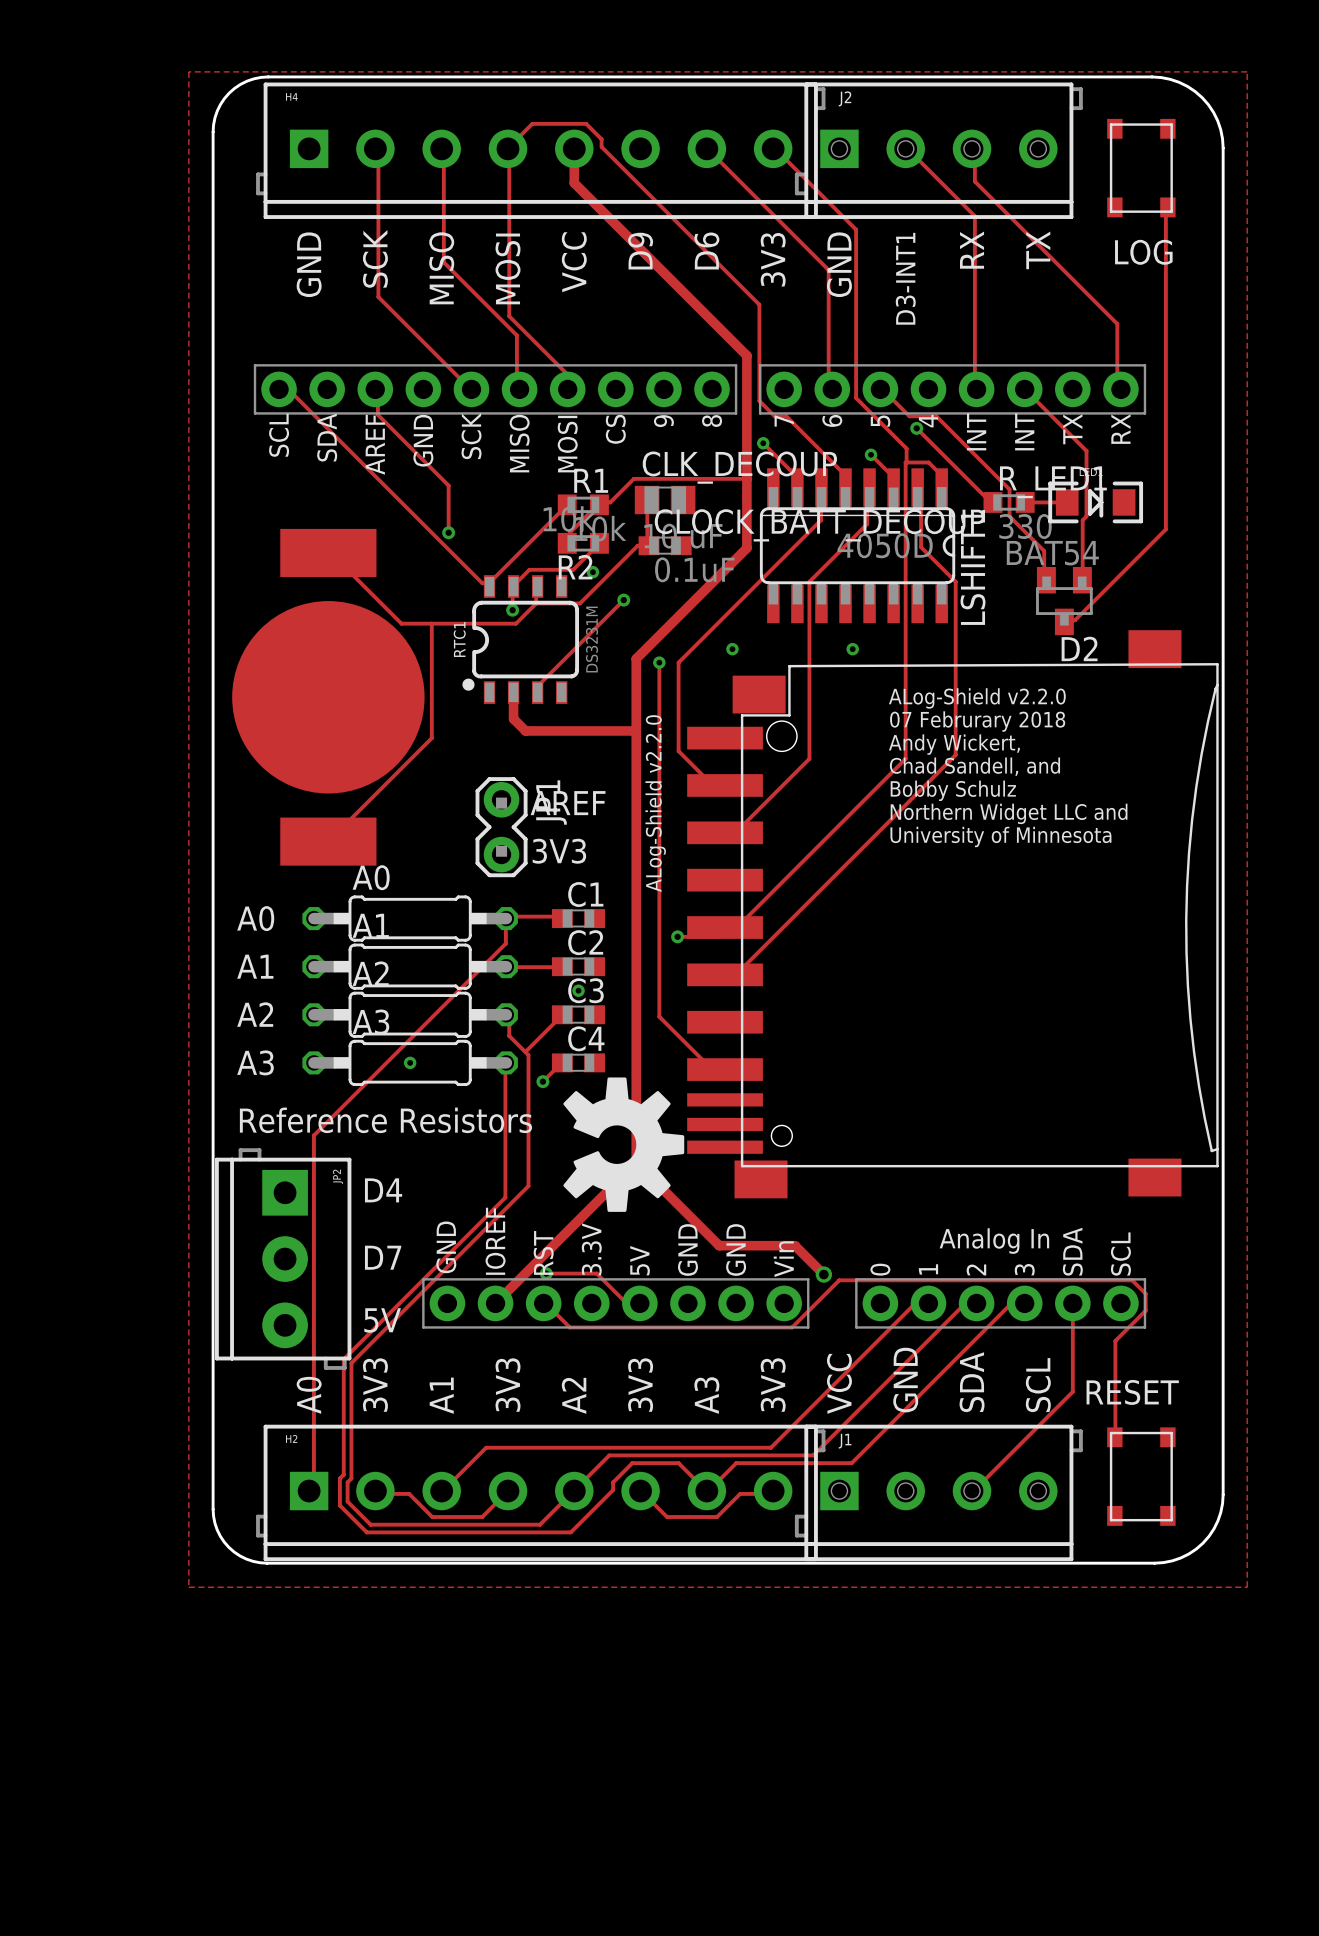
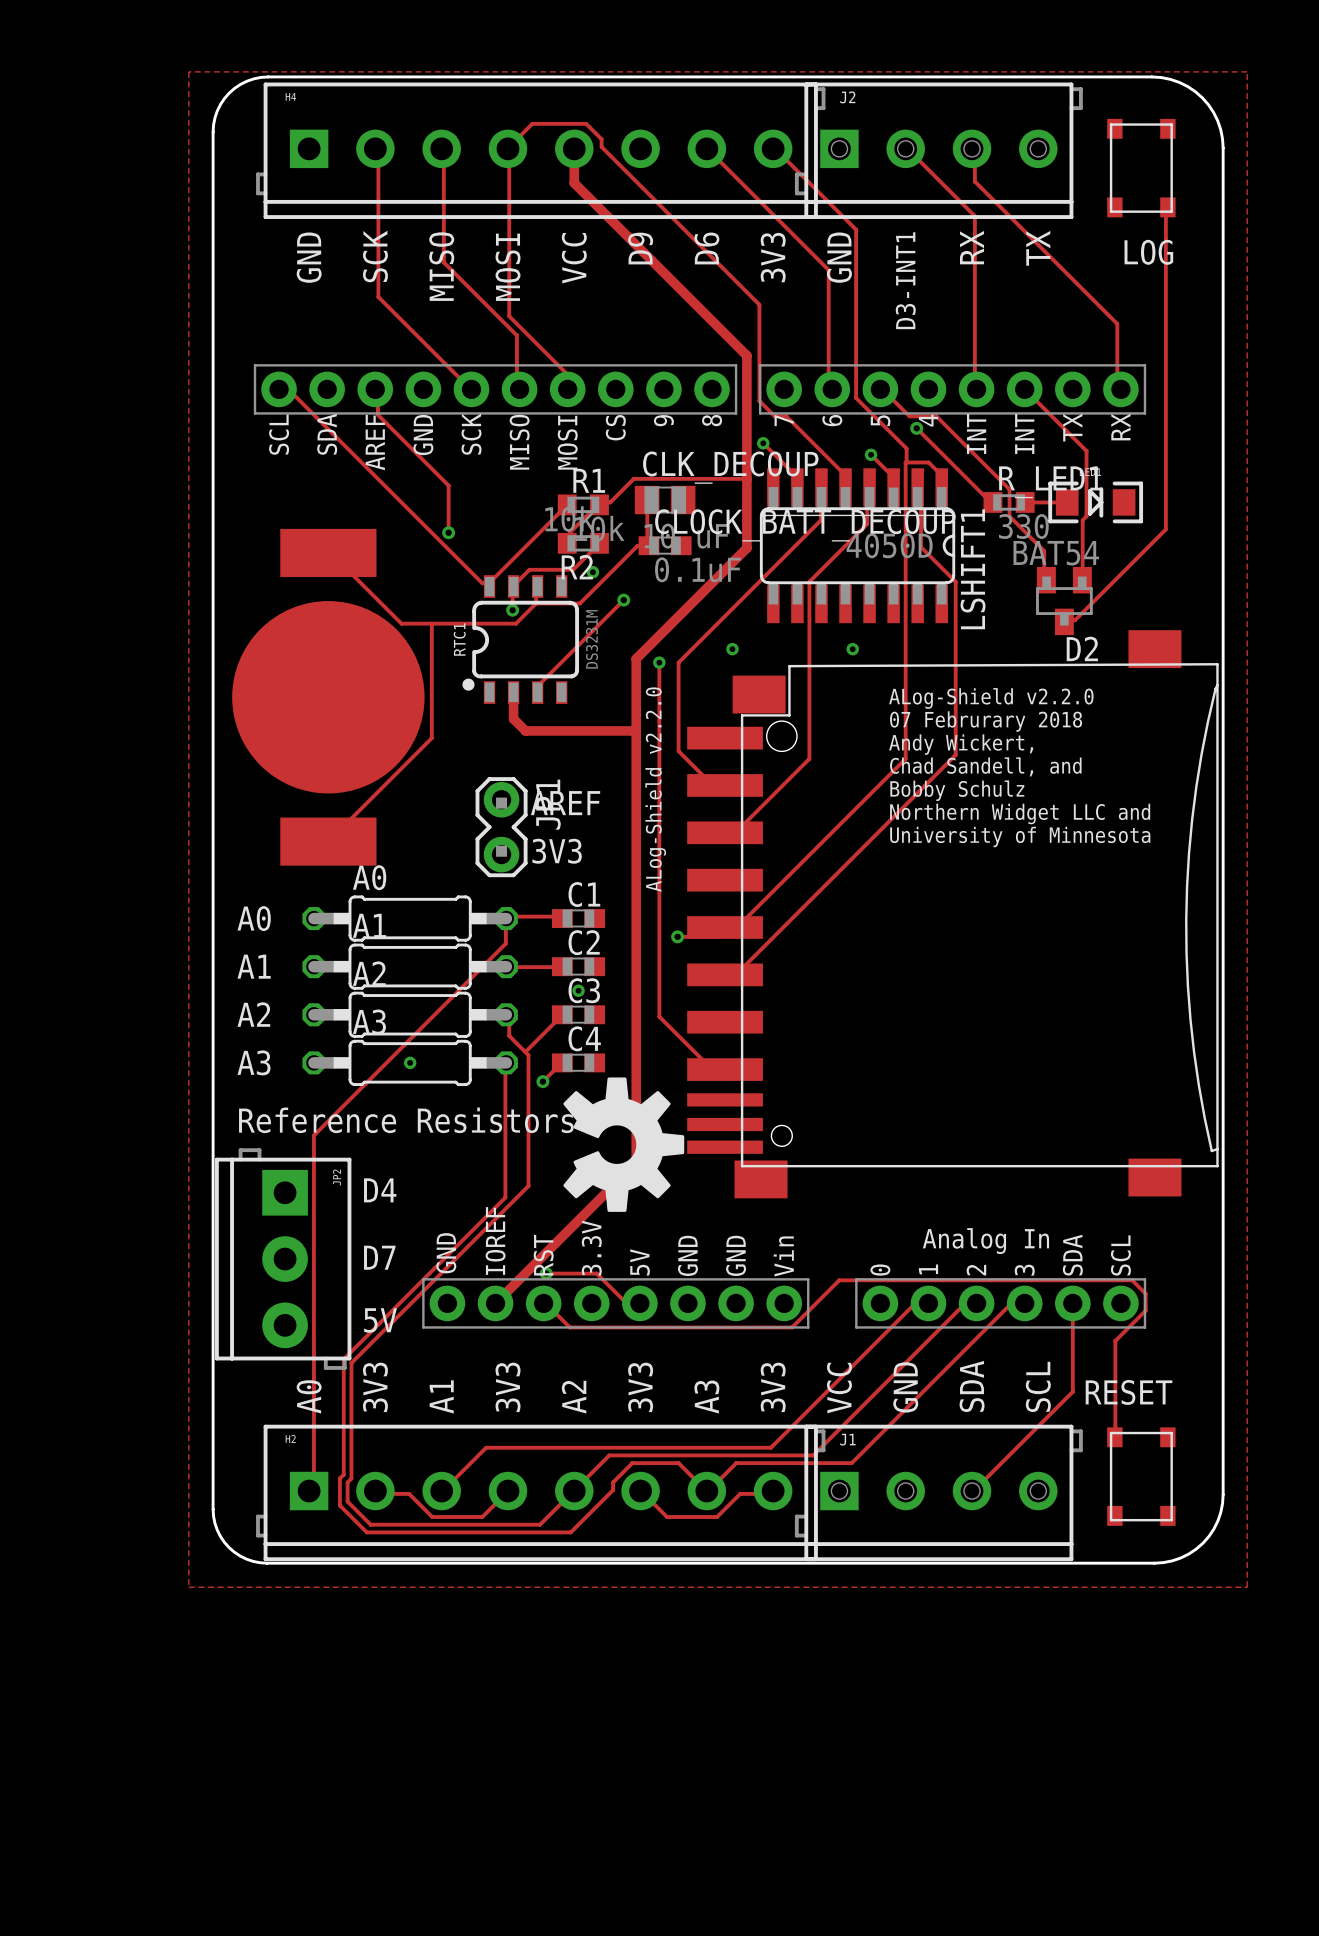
track: (636, 1162) (719, 1245) (795, 1245) (823, 1274) -> none
via: (823, 1274) -> none

